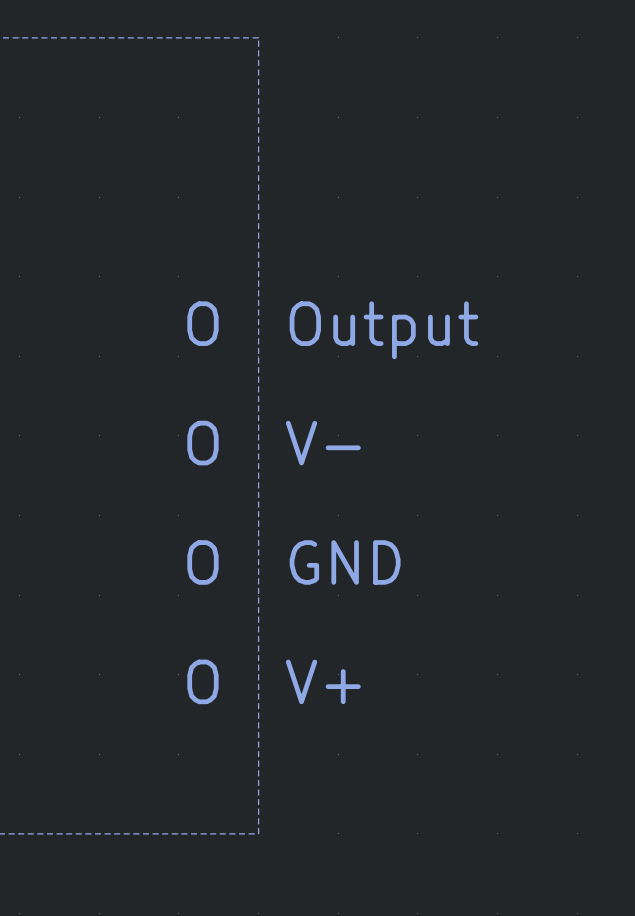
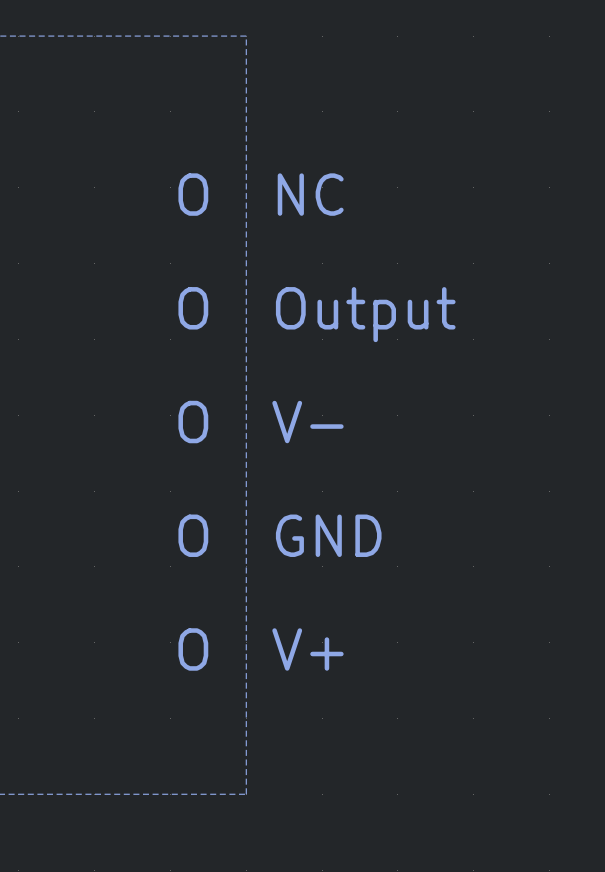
text: none -> O NC (261, 194)

